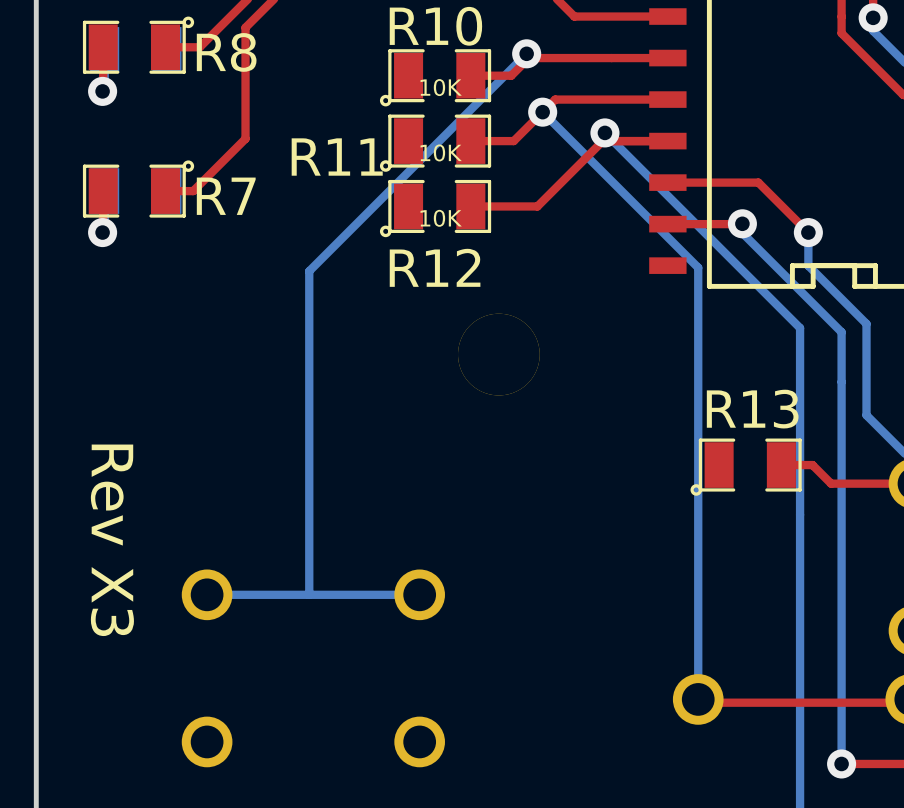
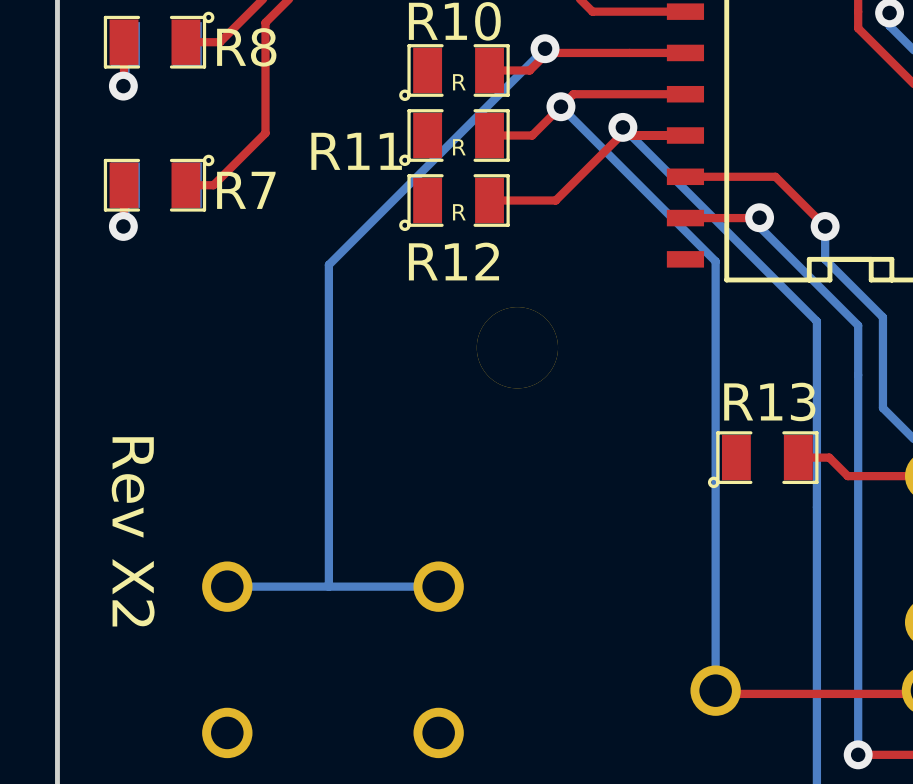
R10 value: 10K (441, 87) -> R (459, 82)
R11 value: 10K (441, 152) -> R (459, 147)
R12 value: 10K (441, 218) -> R (459, 212)
text: Rev X3 (112, 540) -> Rev X2 (133, 531)

